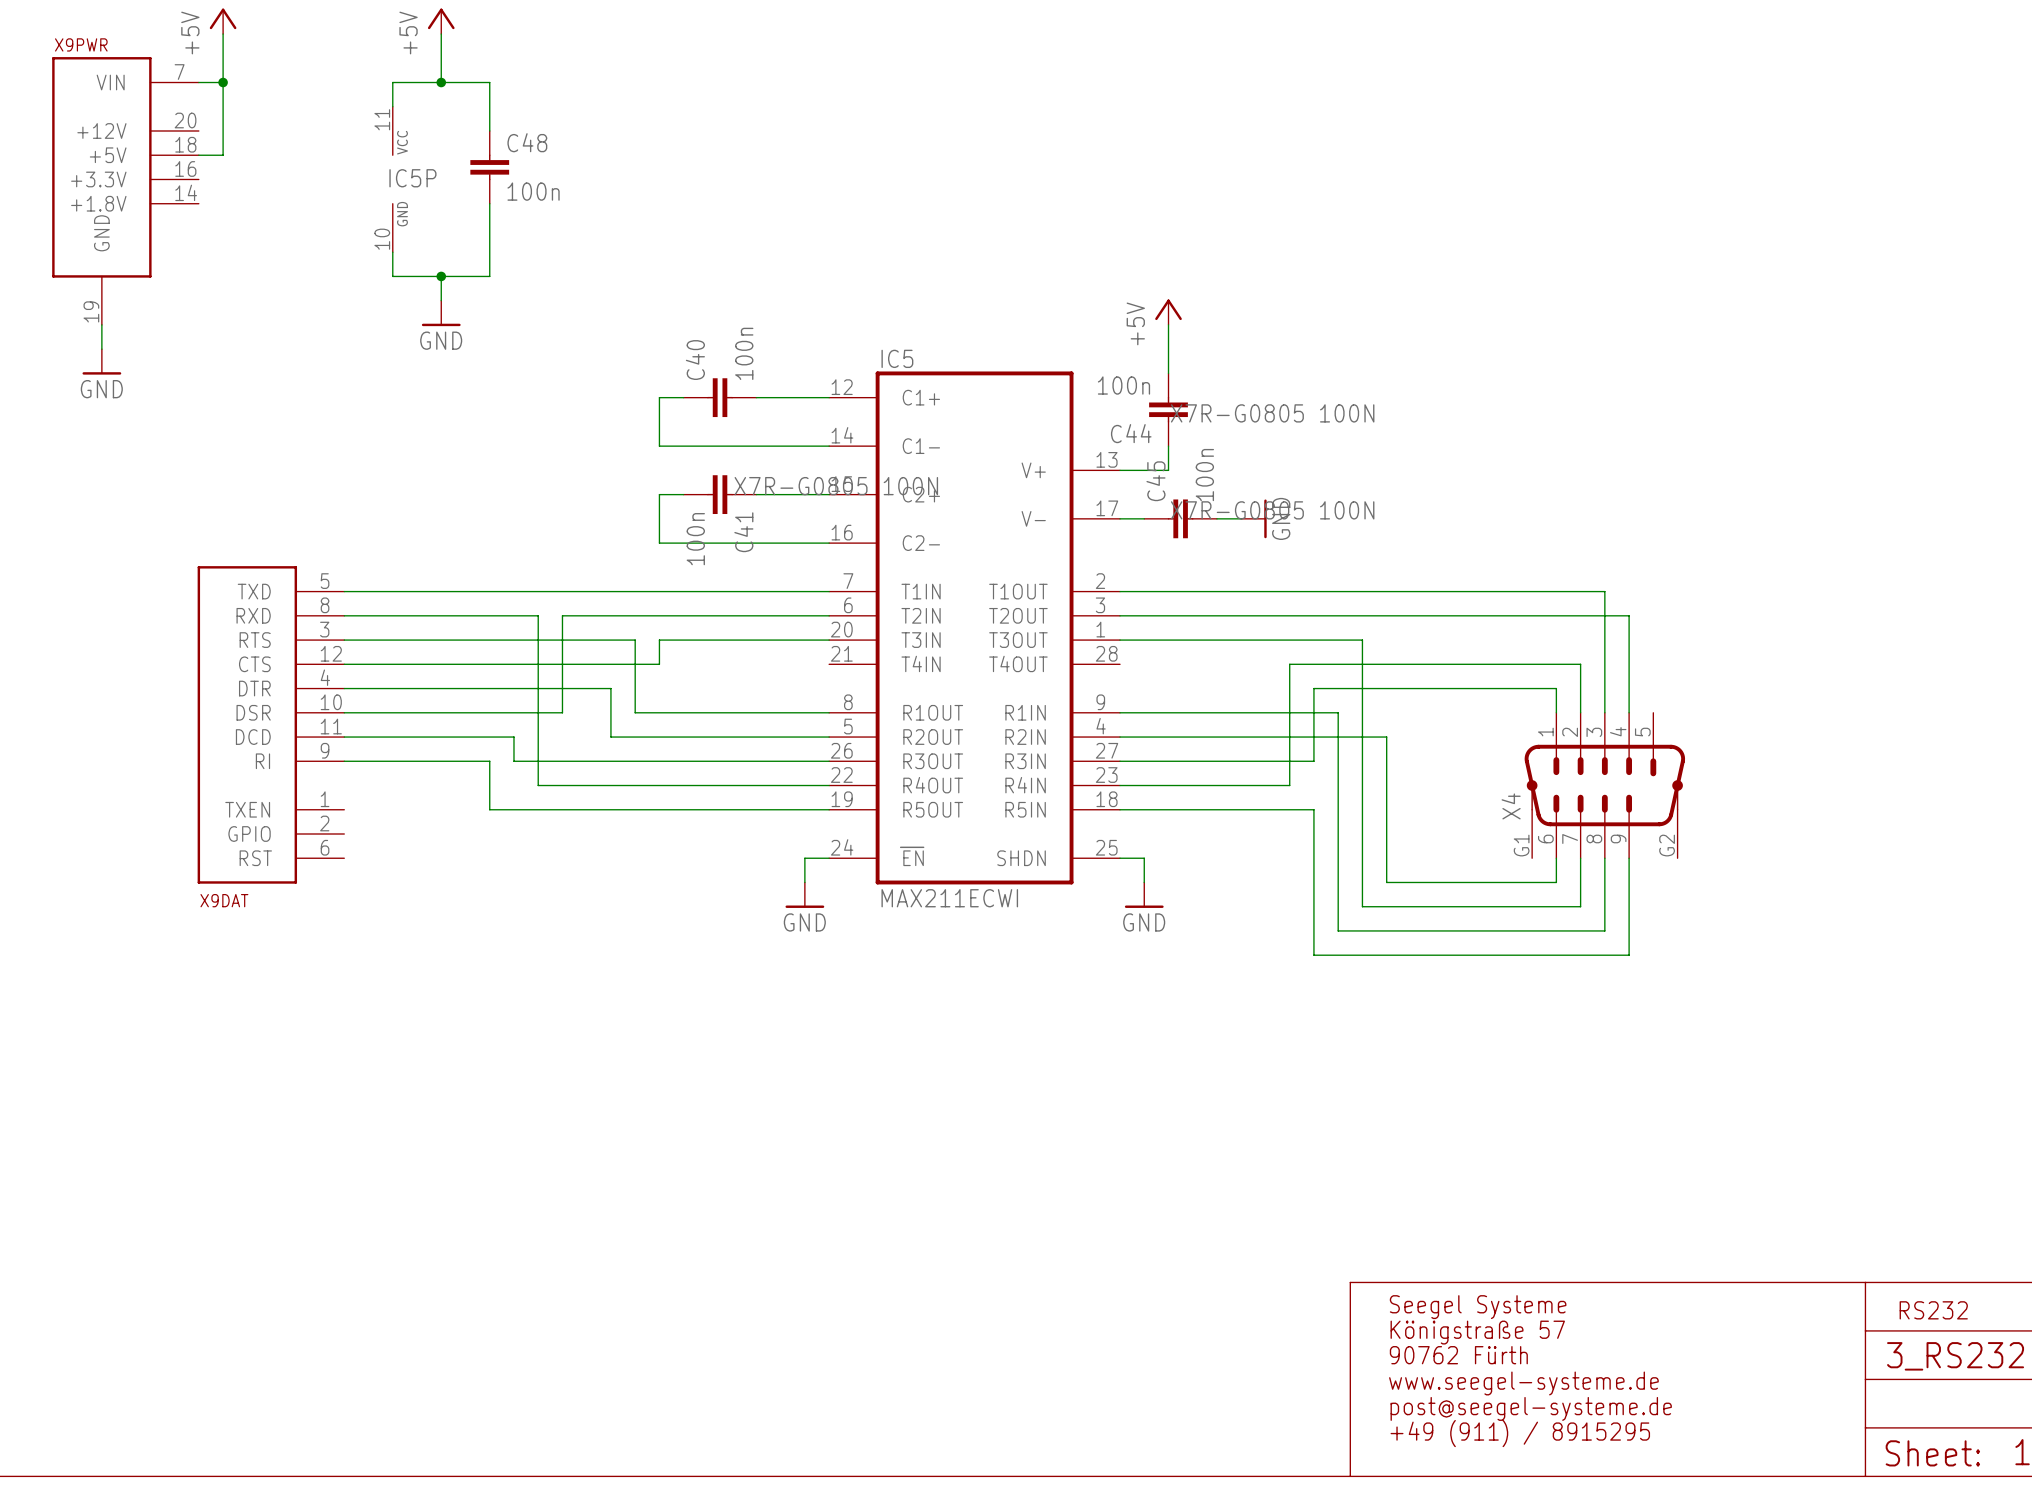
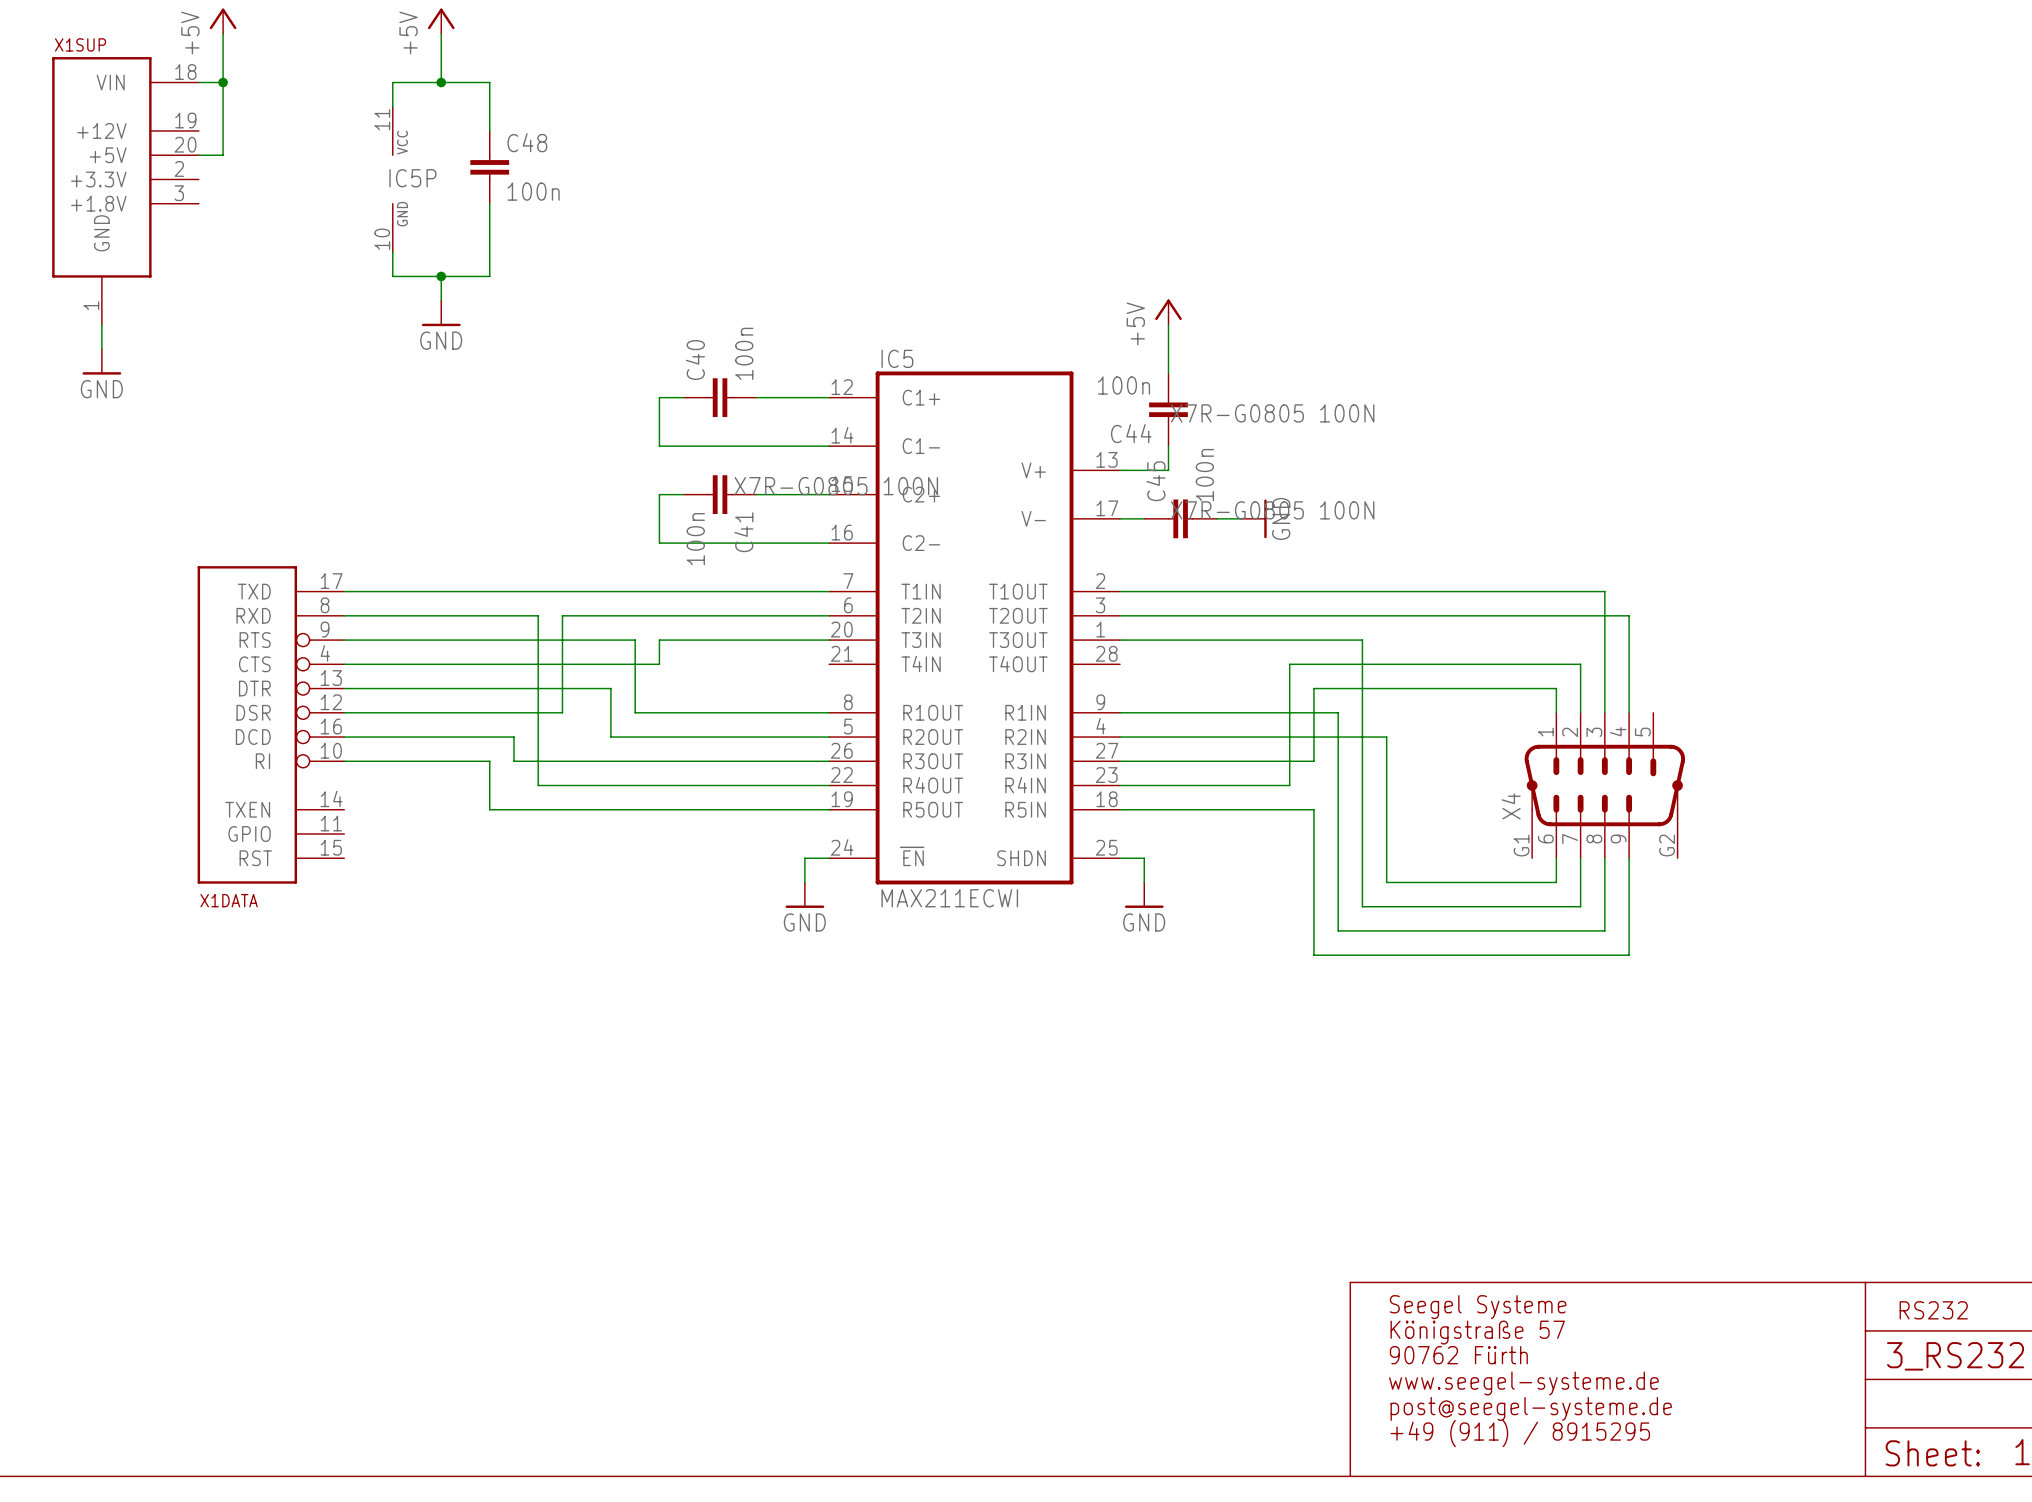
X9PWR name: X9PWR (81, 44) -> X1SUP (80, 44)
X9PWR pin number: 7 (179, 72) -> 18 (185, 72)
X9PWR pin number: 20 (185, 120) -> 19 (185, 120)
X9PWR pin number: 18 (185, 144) -> 20 (185, 144)
X9PWR pin number: 16 (185, 168) -> 2 (179, 168)
X9PWR pin number: 14 (186, 192) -> 3 (179, 193)
X9PWR pin number: 19 (91, 311) -> 1 (91, 305)
X9DAT: (270, 724) -> none
X1DATA: none -> (270, 724)

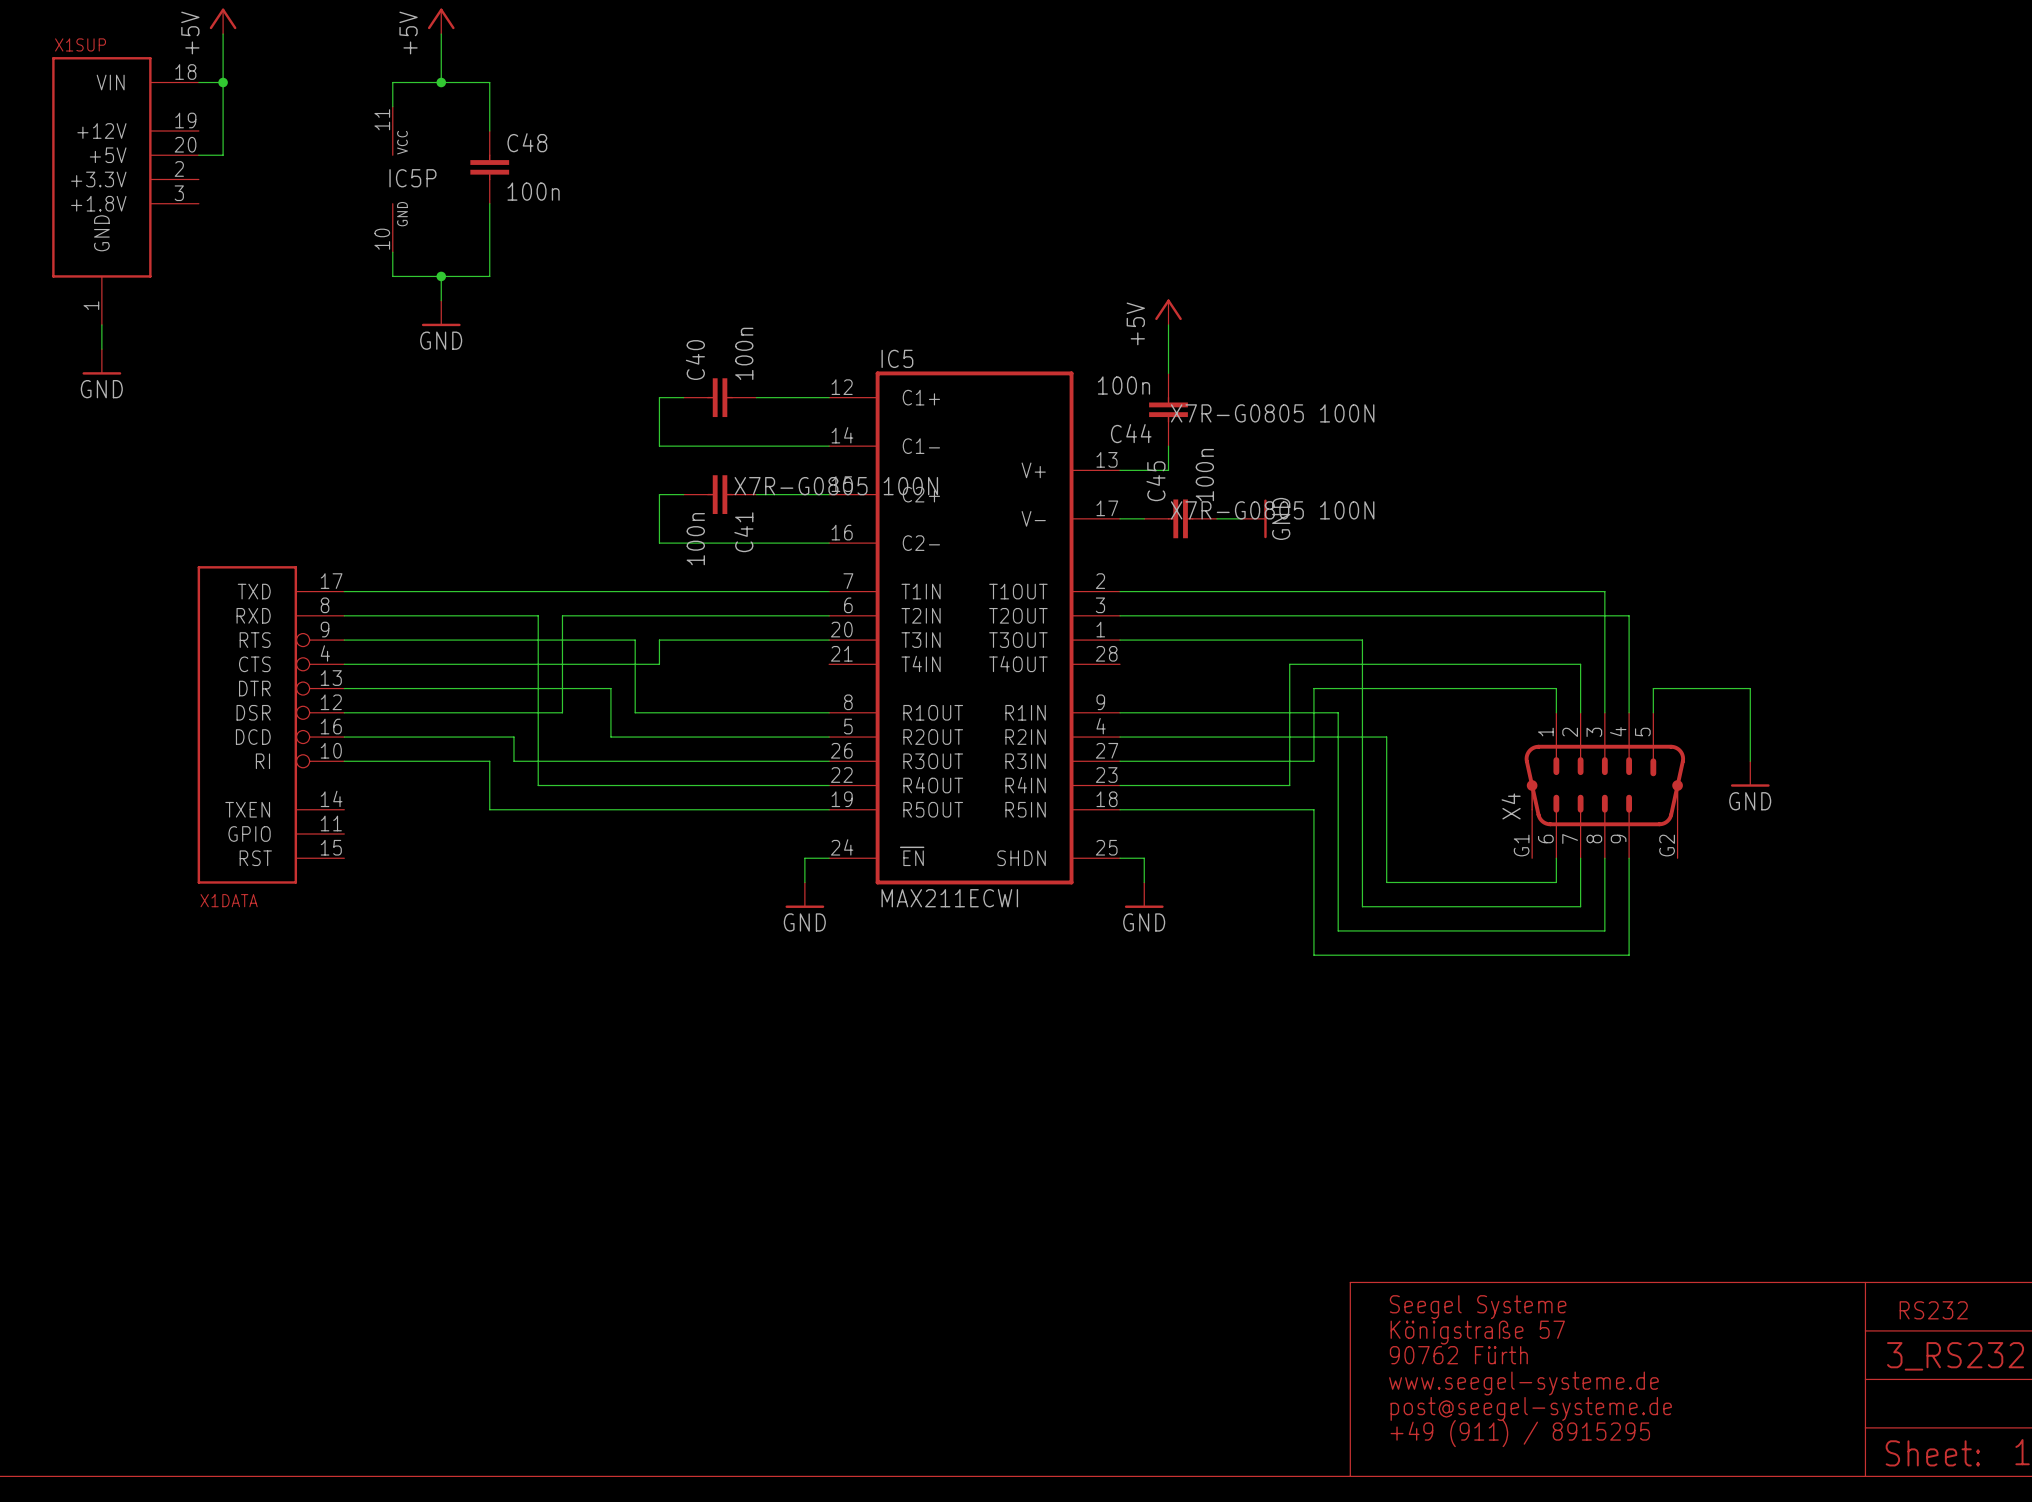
wire: none -> (1653, 712) (1653, 688) (1750, 688) (1750, 761)
power symbol: none -> GND (1750, 774)

